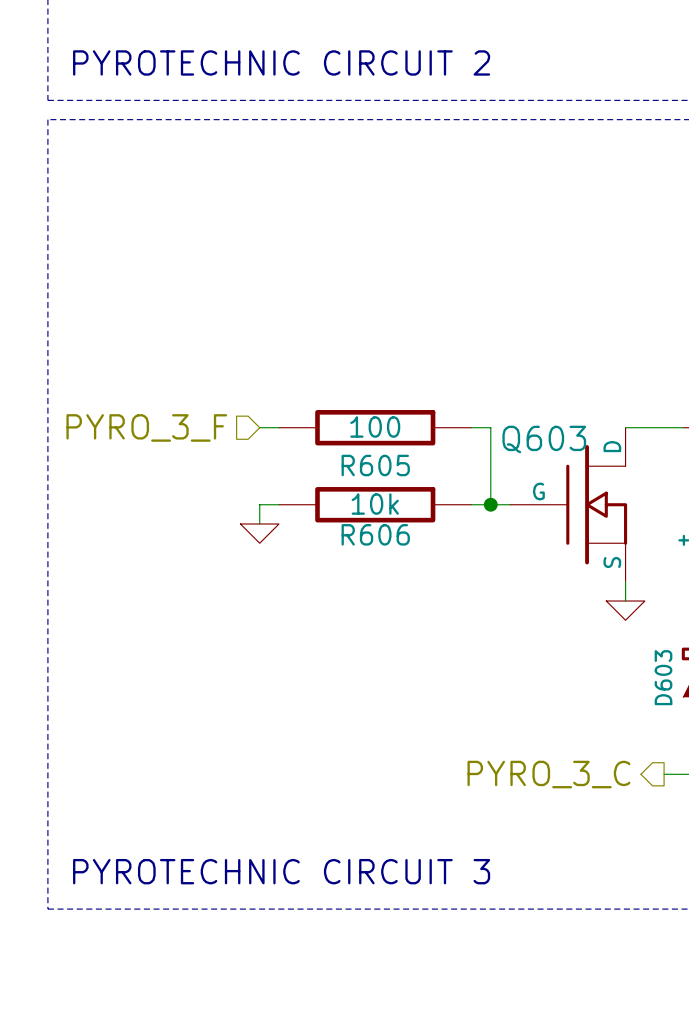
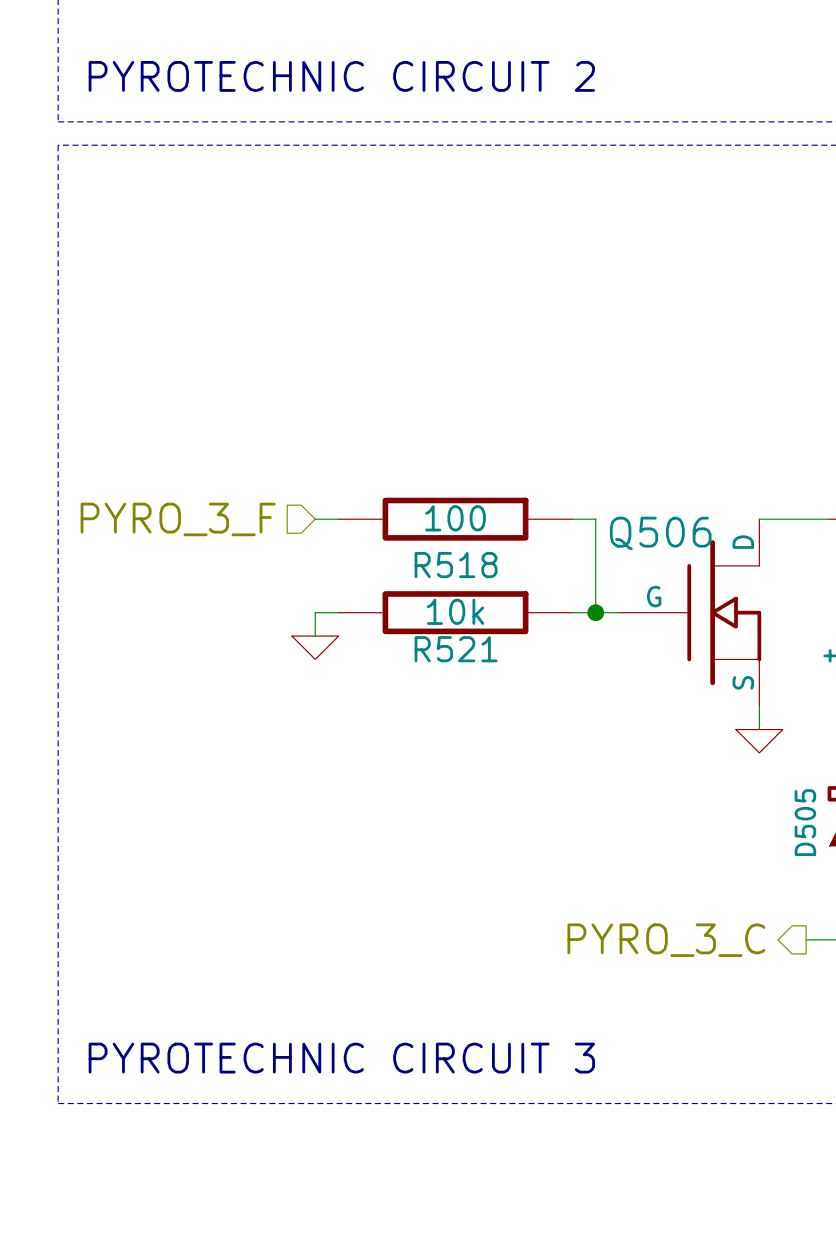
Q603 name: Q603 (544, 439) -> Q506 (660, 533)
R605 name: R605 (375, 465) -> R518 (456, 565)
R606 name: R606 (375, 534) -> R521 (456, 649)
D603 name: D603 (663, 677) -> D505 (805, 822)

